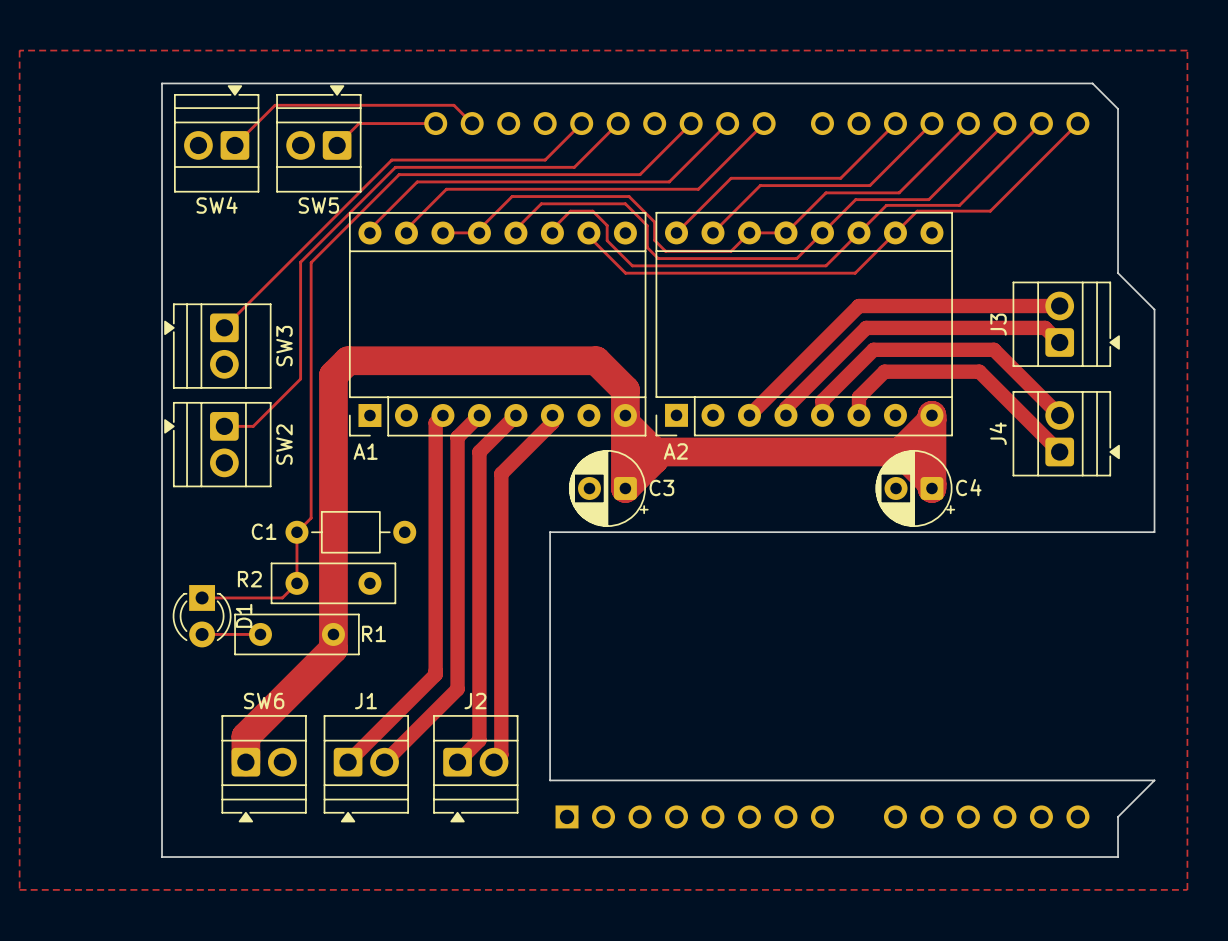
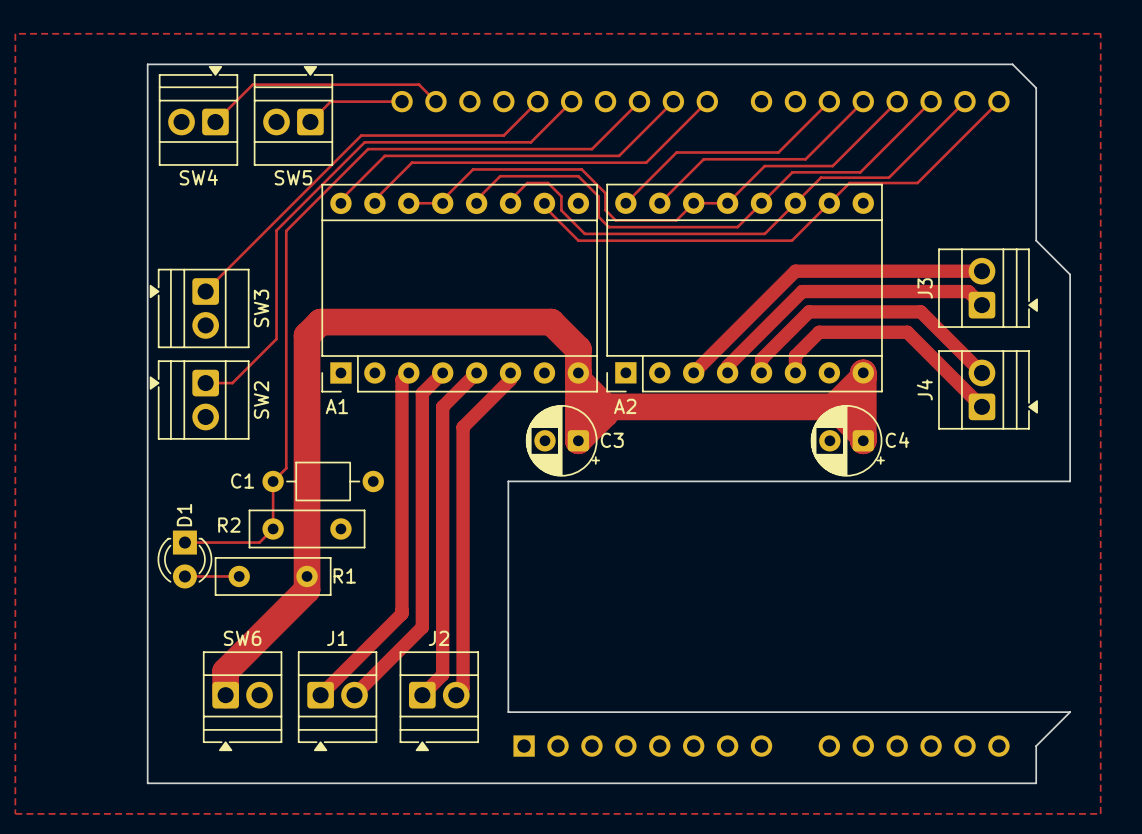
D1 name position: D1 (244, 615) -> D1 (184, 515)

